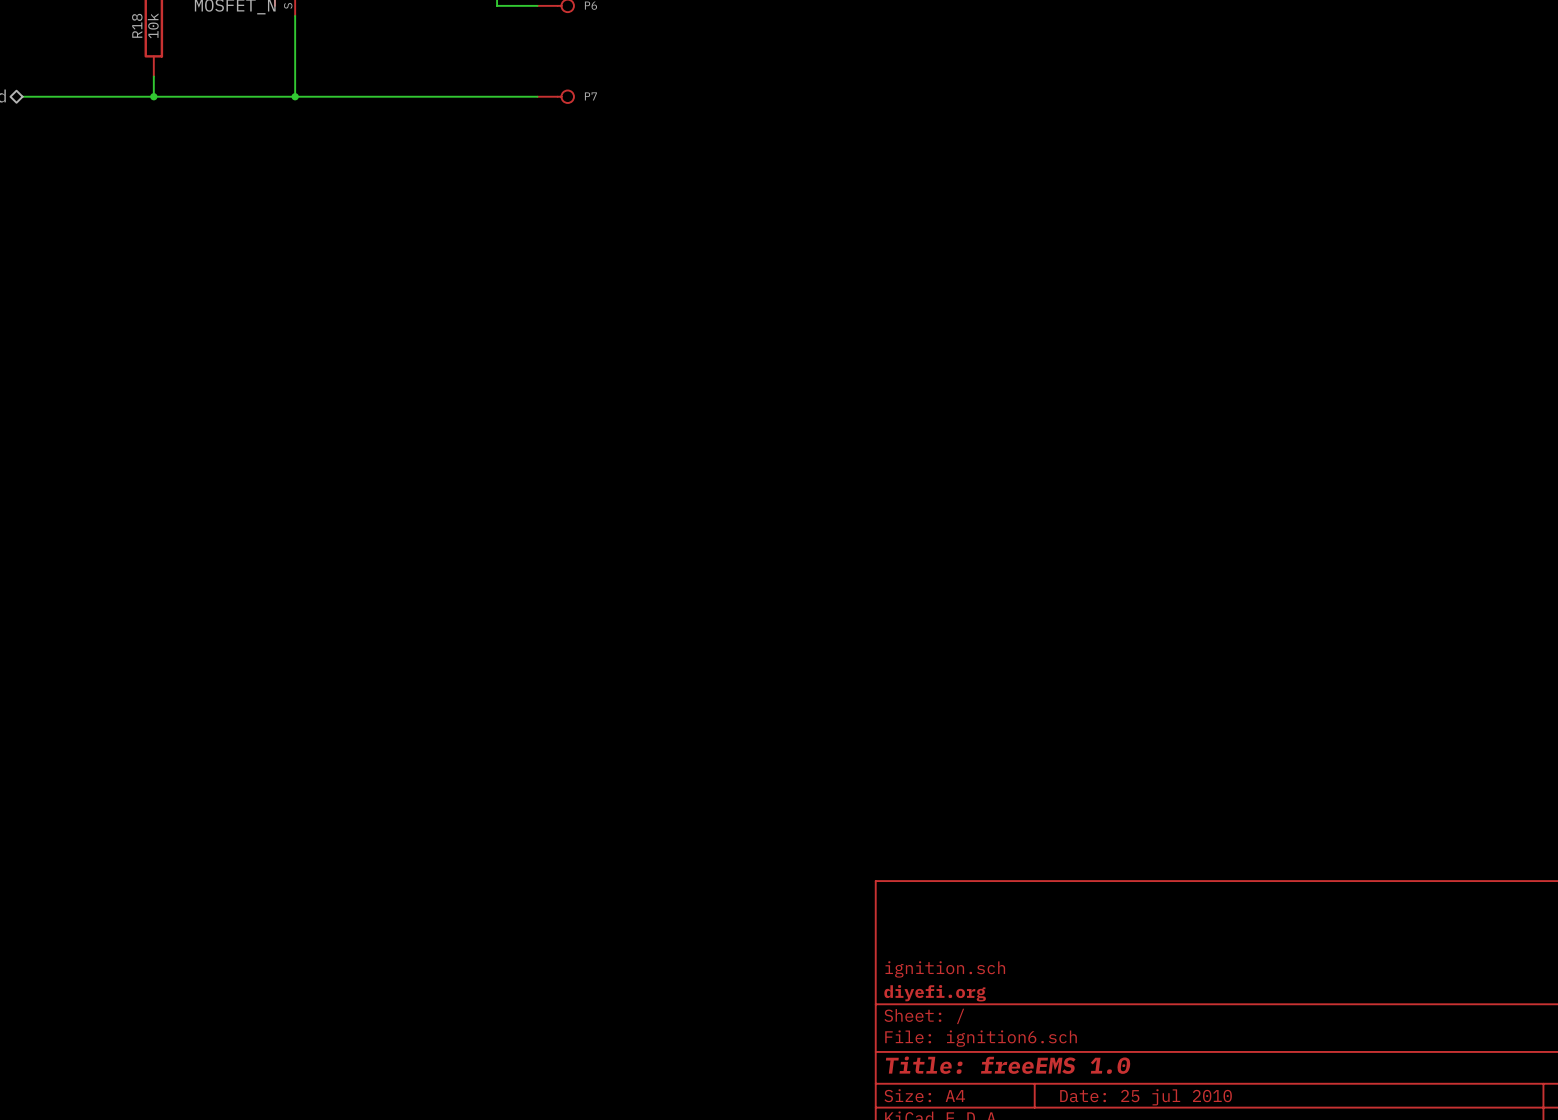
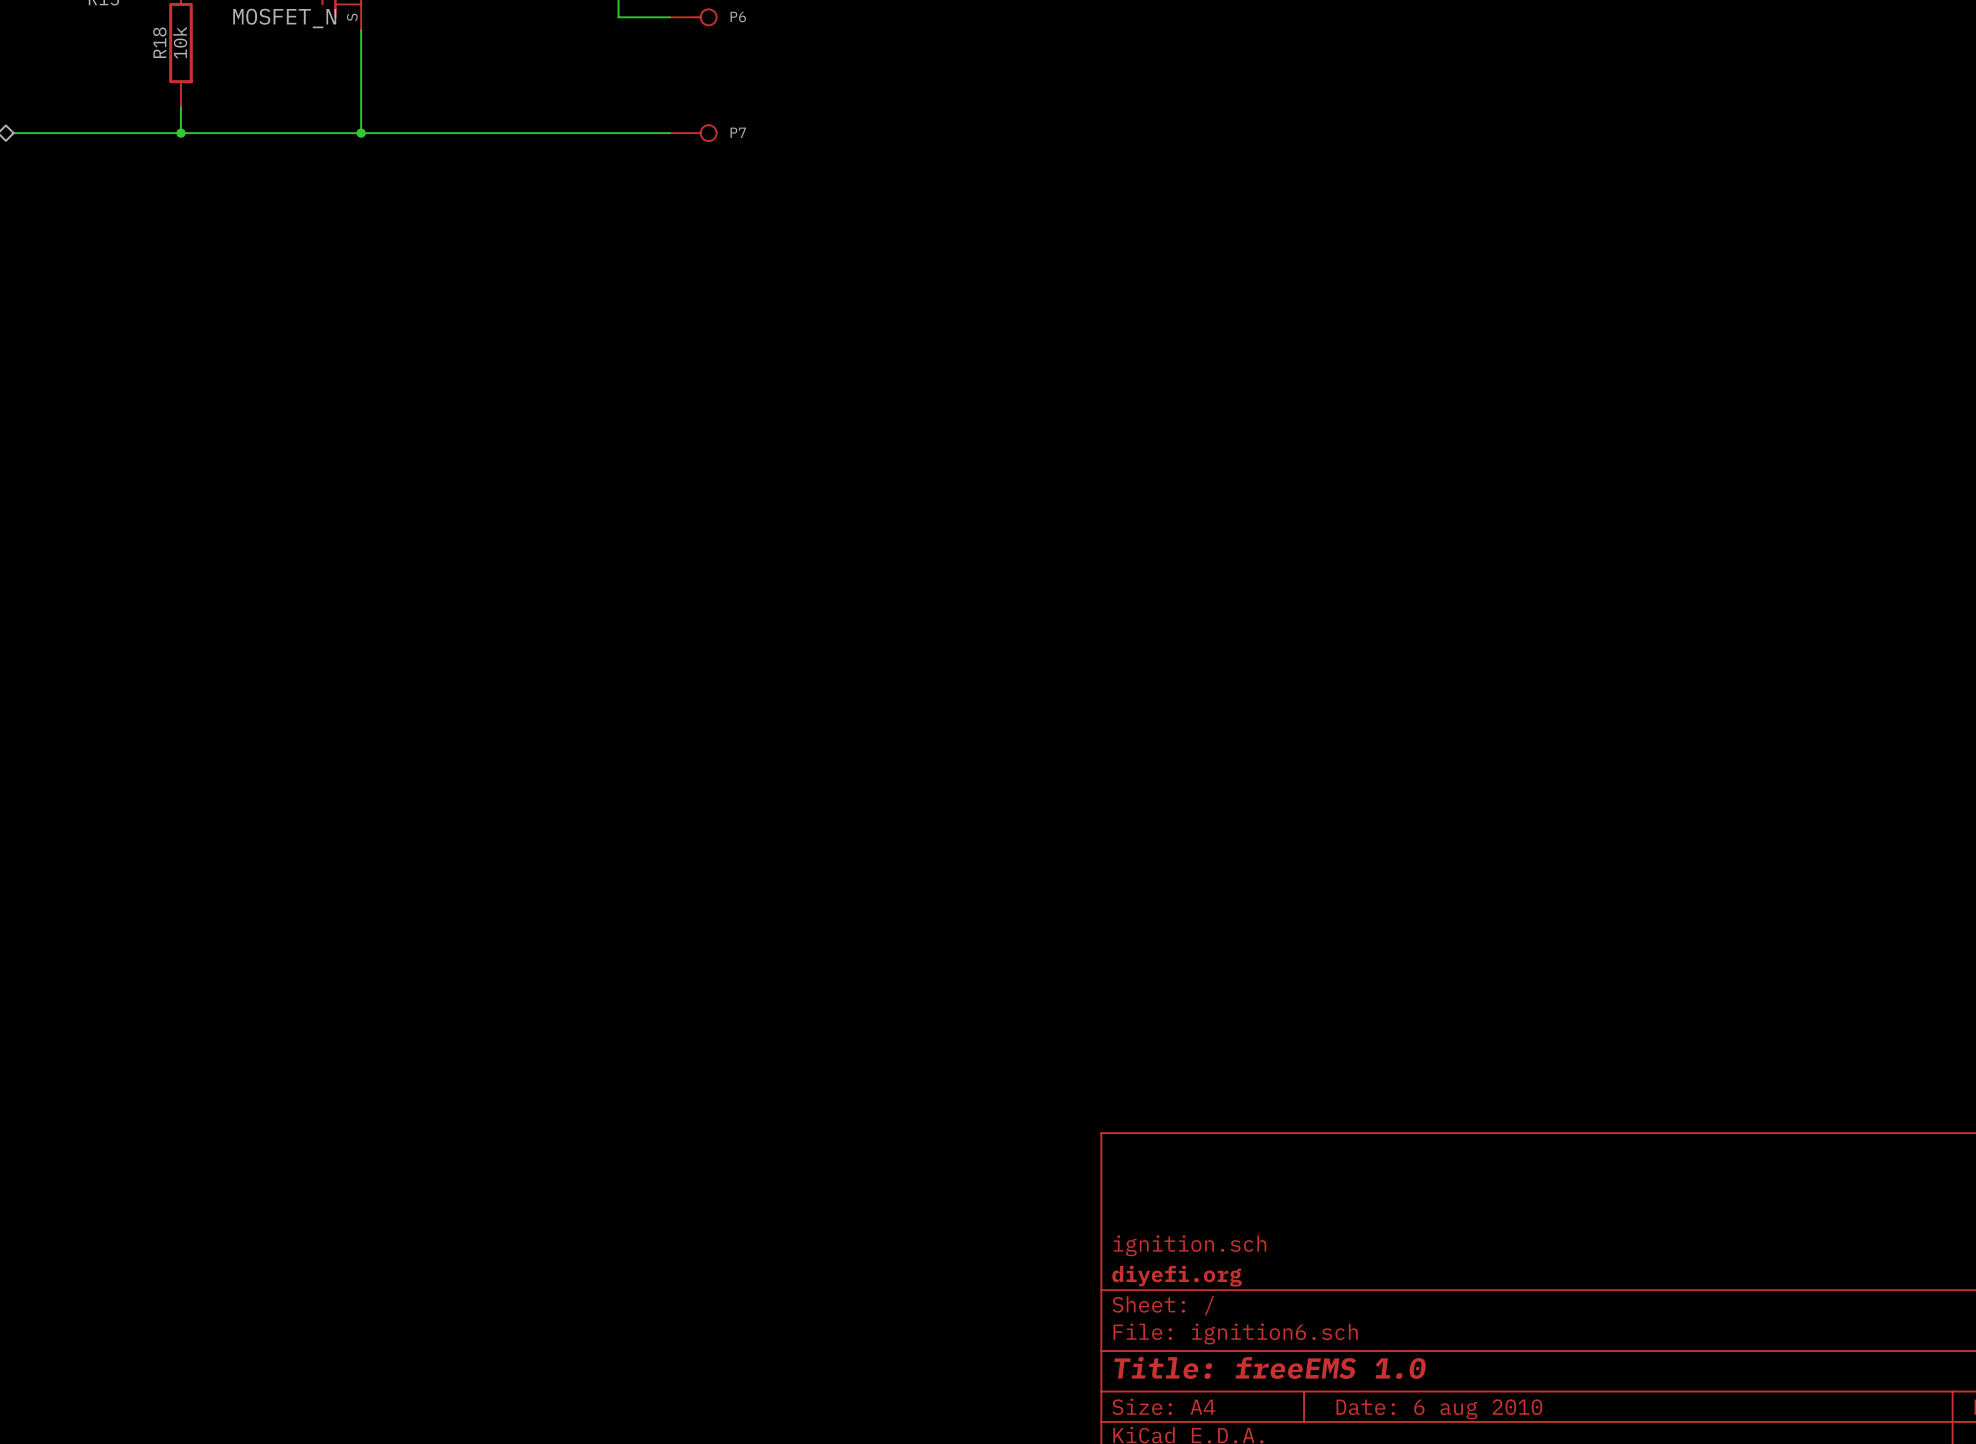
title block: Date: 25 jul 2010 (1146, 1097) -> Date: 6 aug 2010 (1439, 1409)

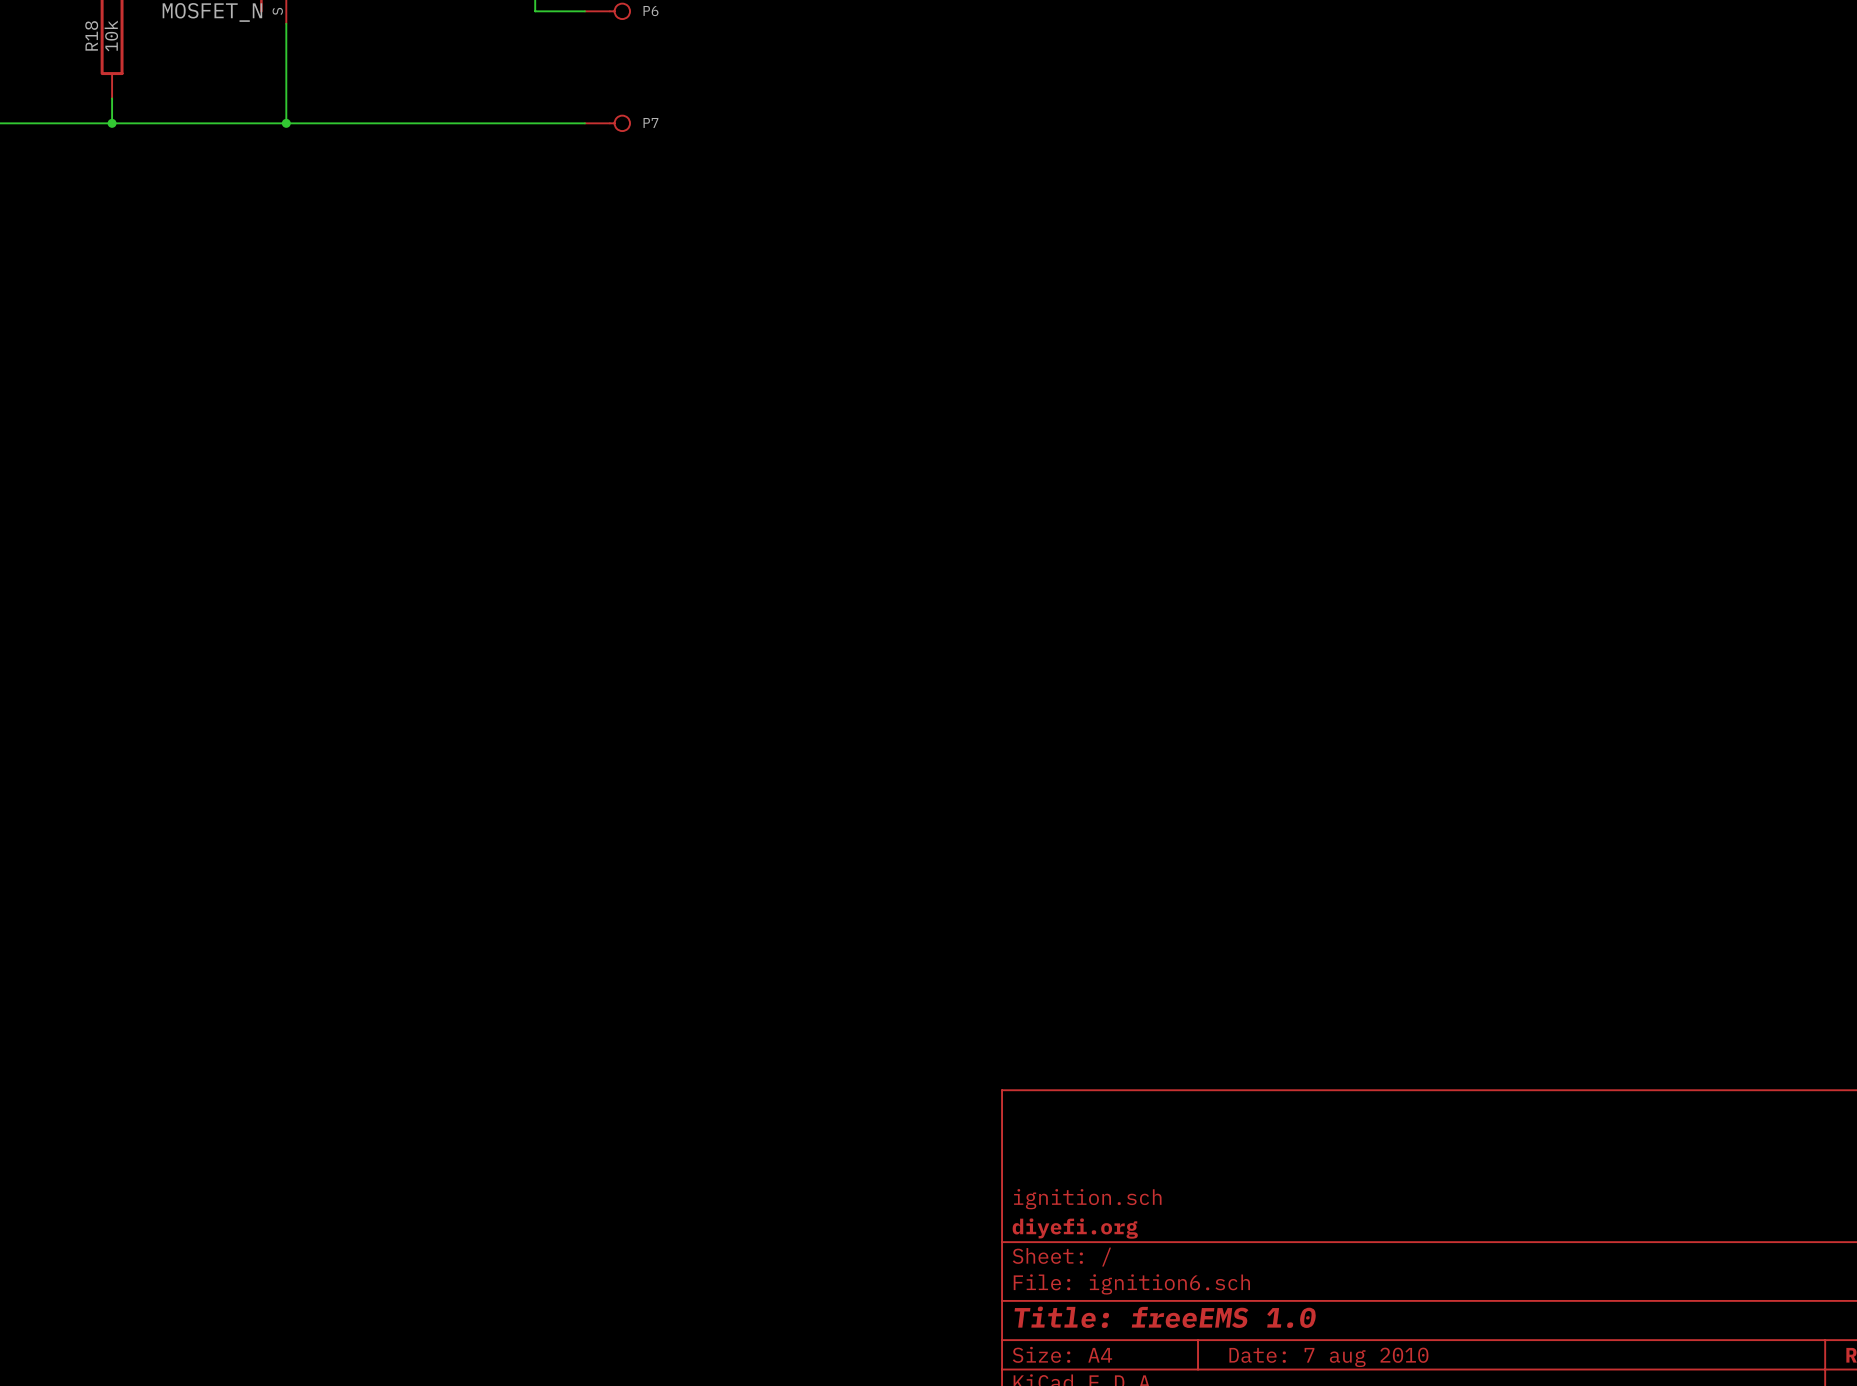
title block: Date: 6 aug 2010 (1439, 1409) -> Date: 7 aug 2010 (1328, 1357)

